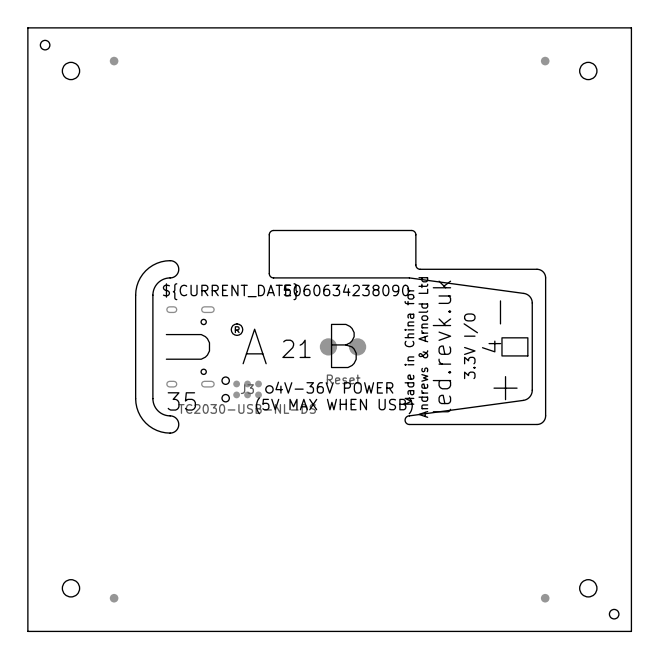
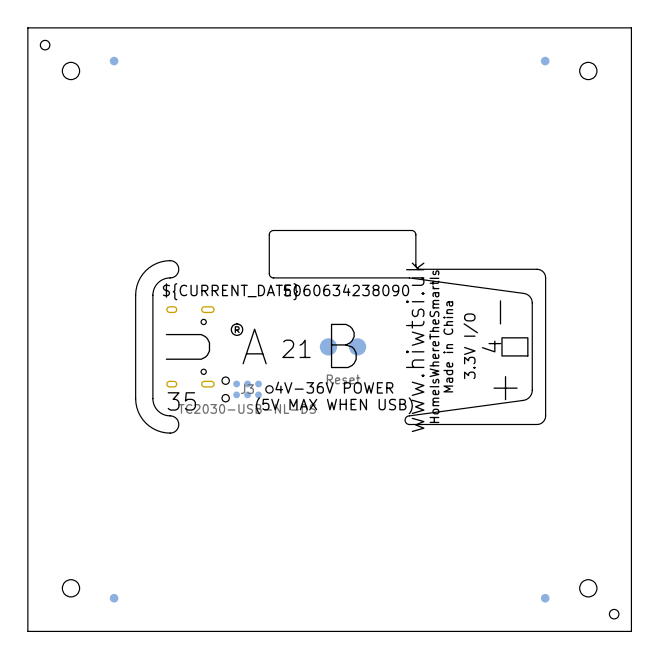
text: Made in China for (409, 346) -> none
text: none -> HomeIsWhereTheSmartIs (434, 346)
text: led.revk.uk (441, 346) -> none
text: none -> Made in China (448, 346)
text: none -> www.hiwtsi.uk (415, 347)
text: Andrews & Arnold Ltd (423, 347) -> none

